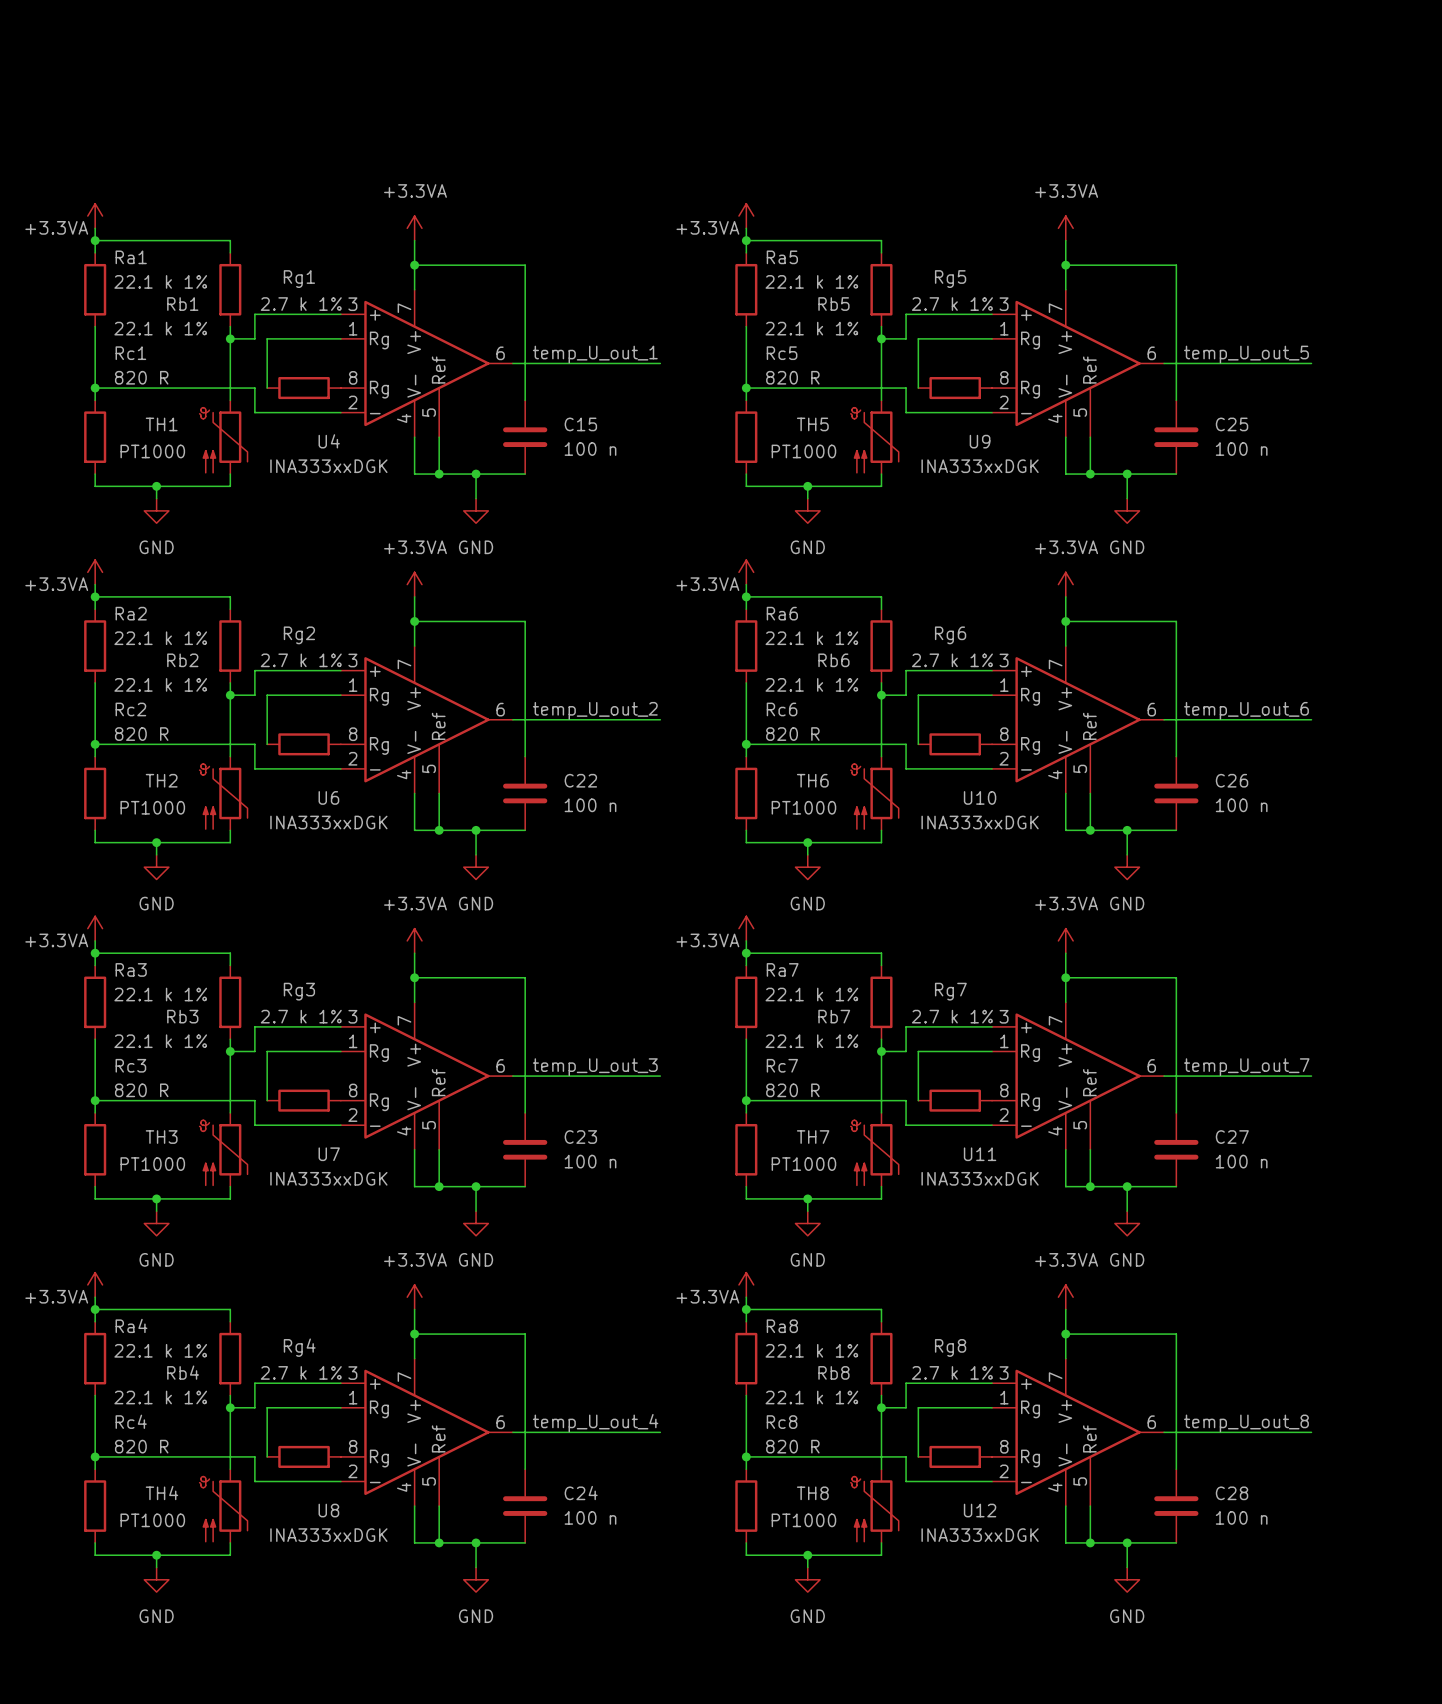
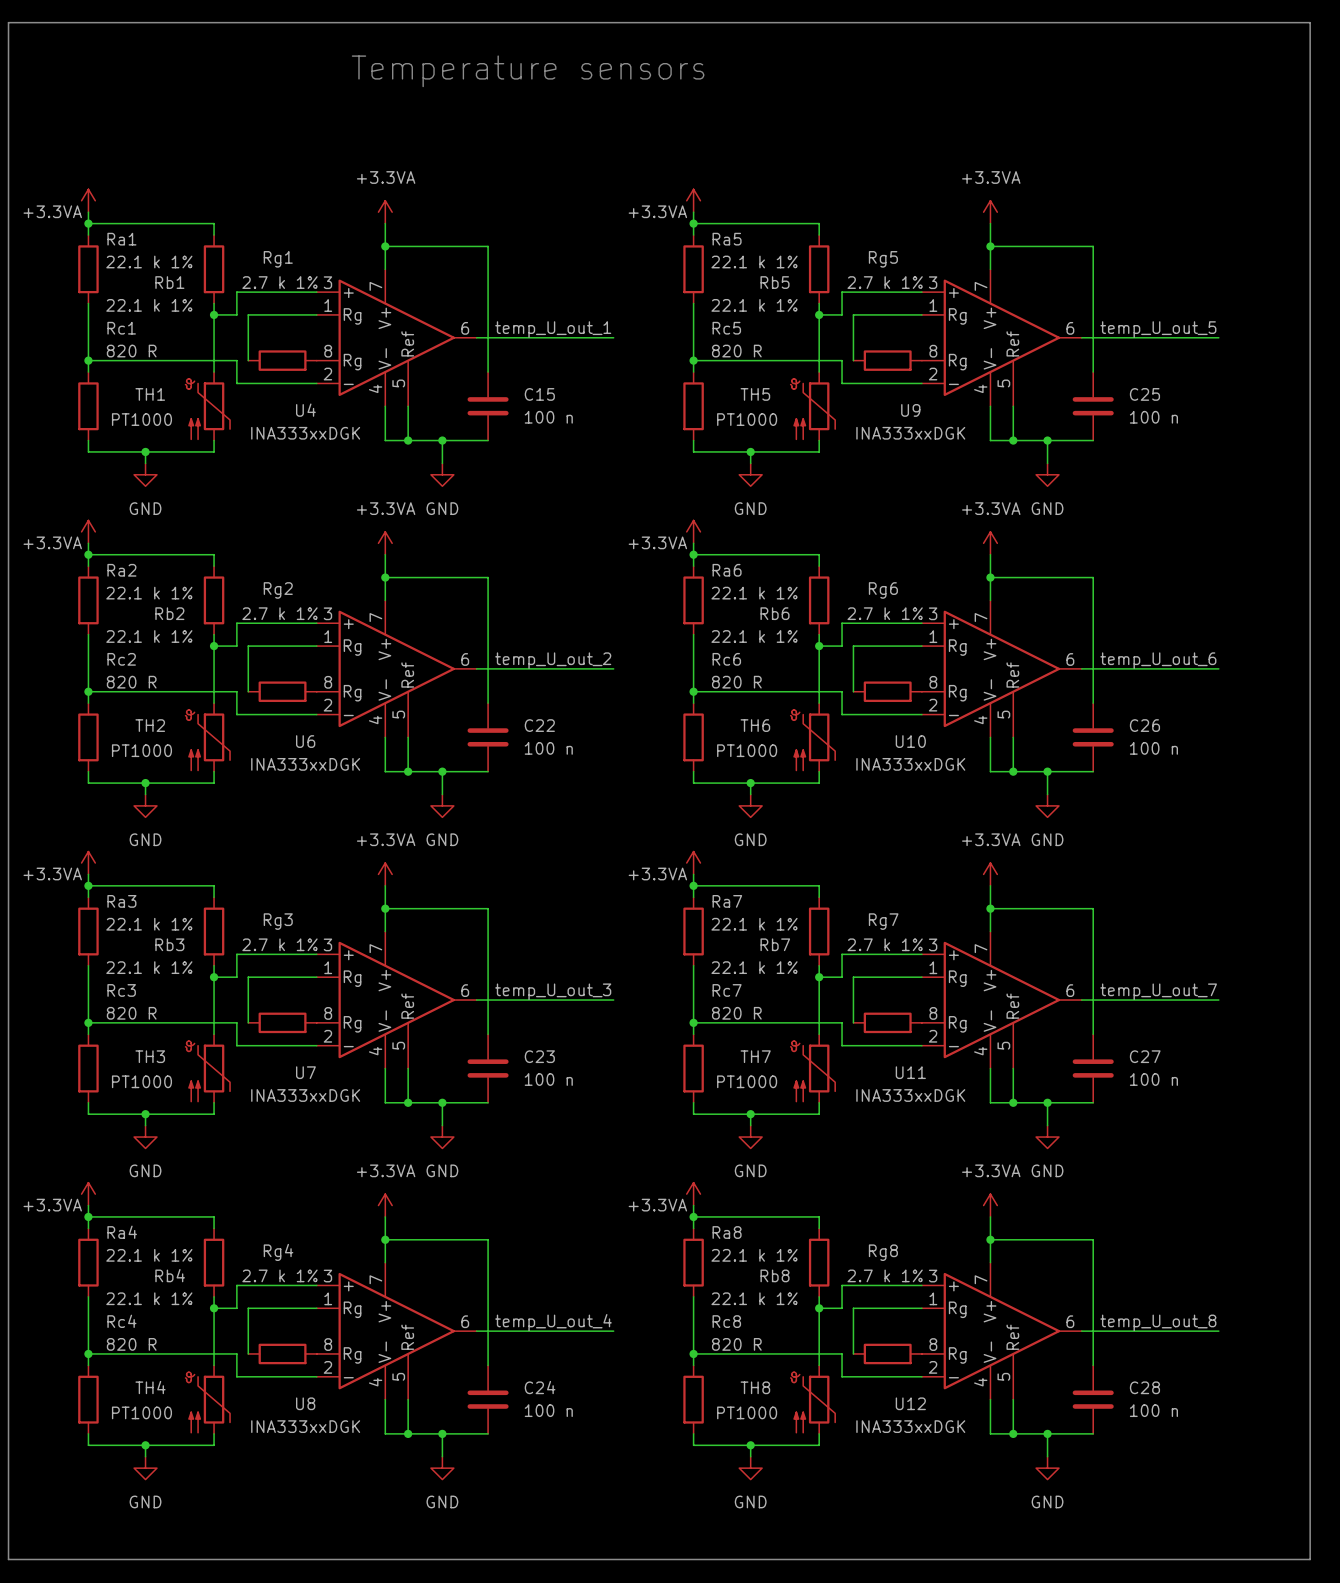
line: none -> (8, 22) (1310, 22) (1310, 1559) (8, 1559) (8, 22)
text: none -> Temperature sensors (528, 71)

